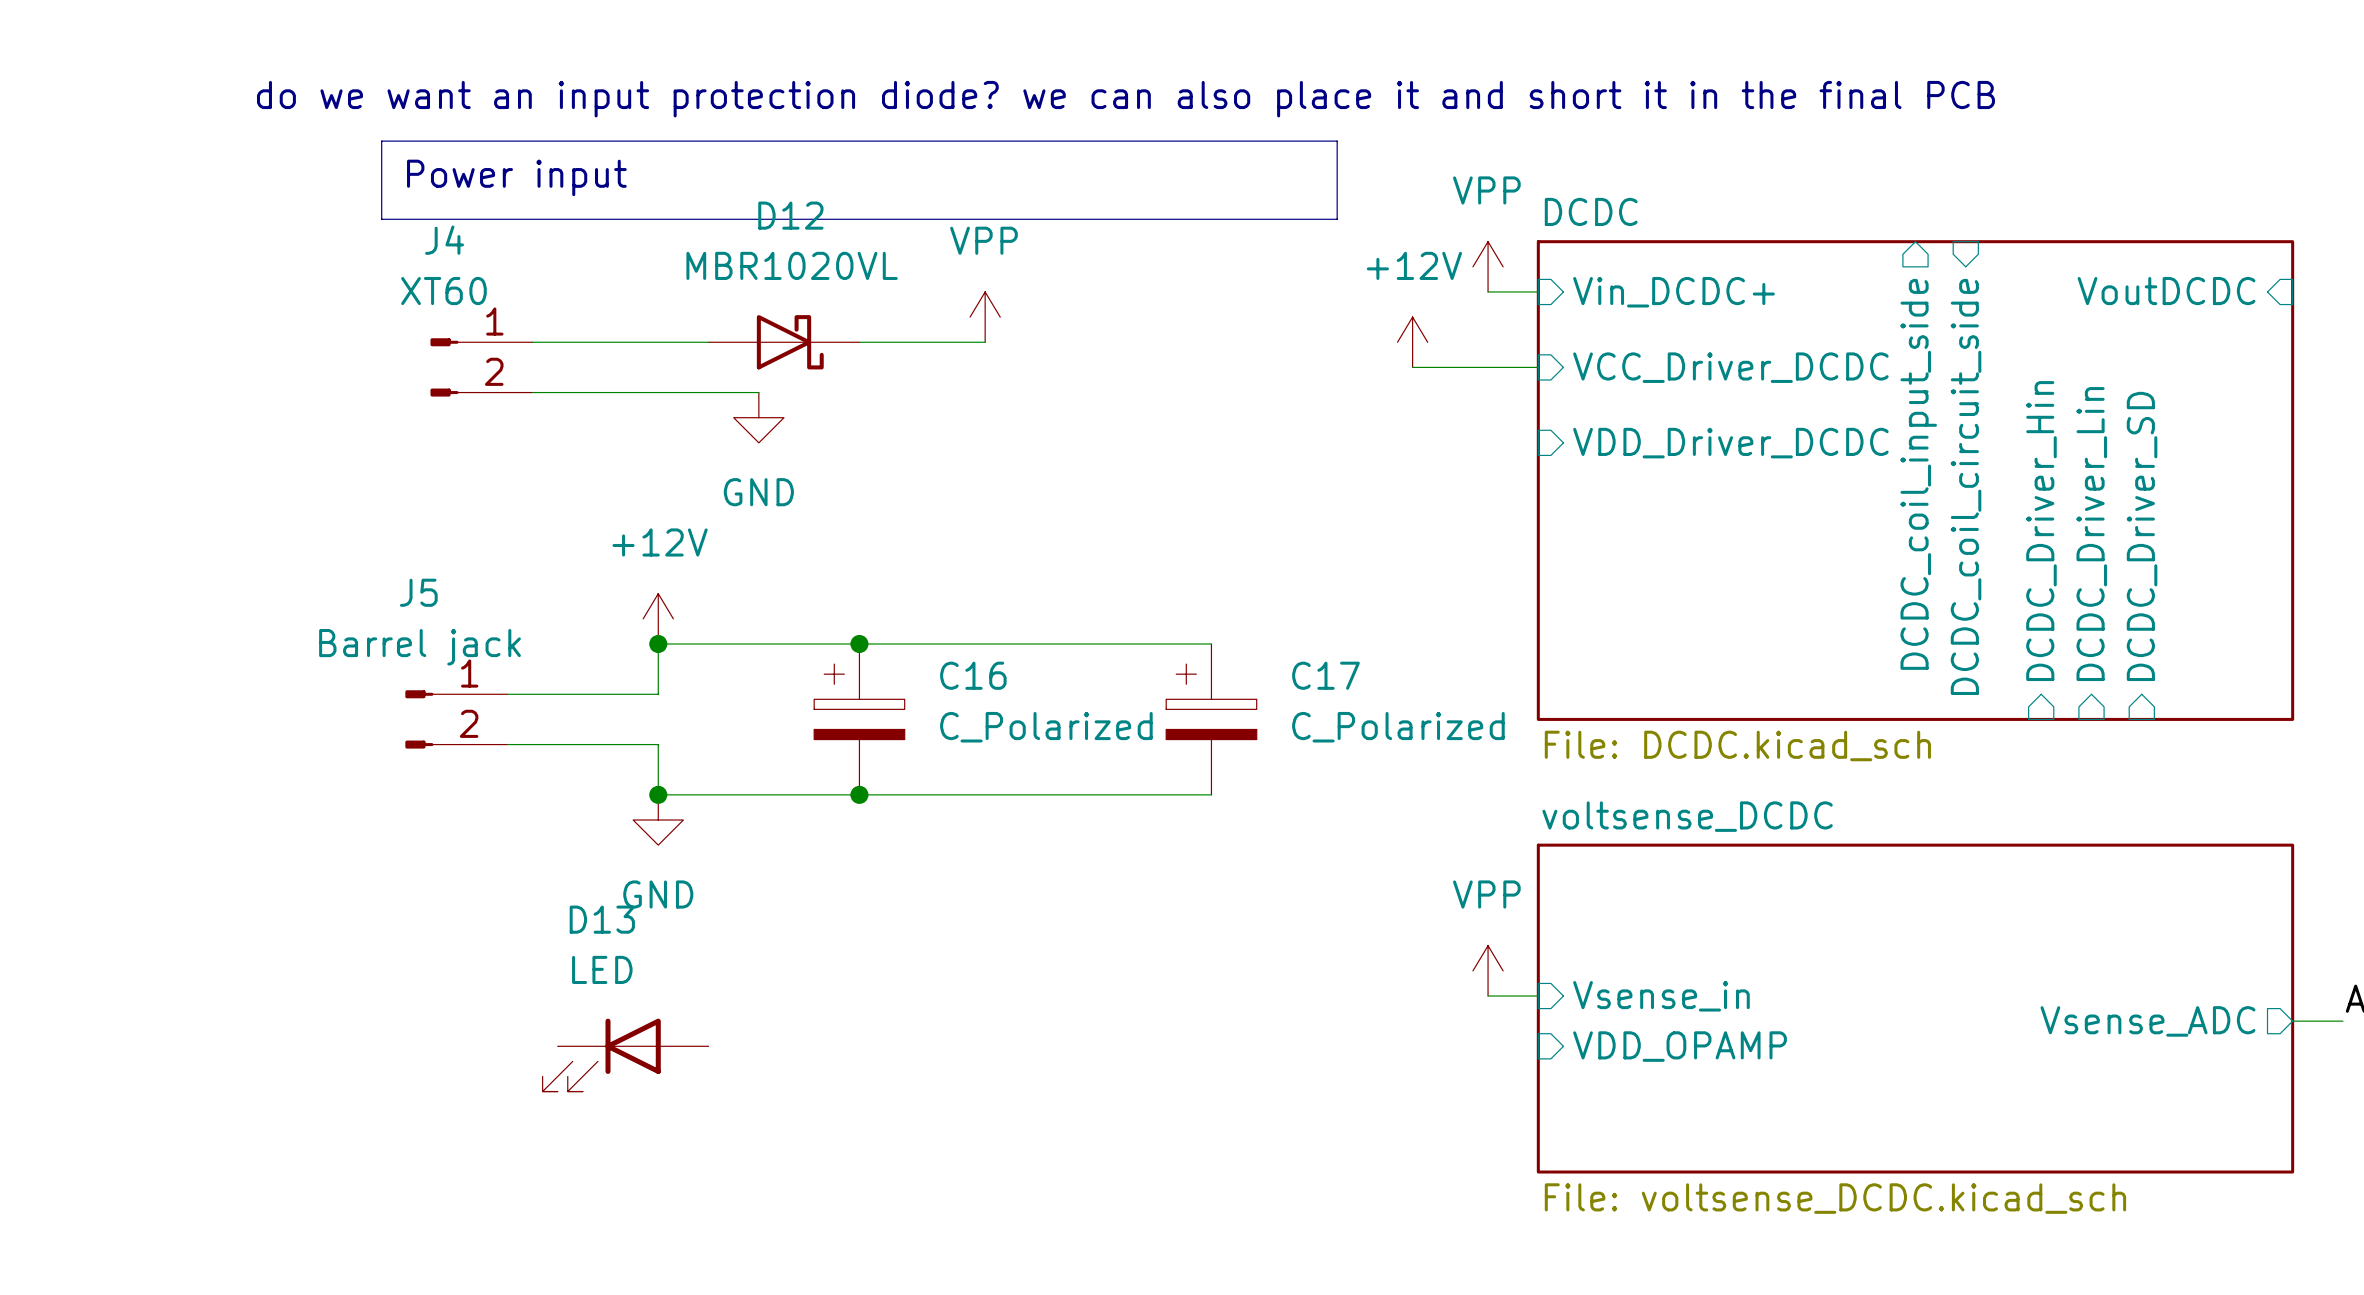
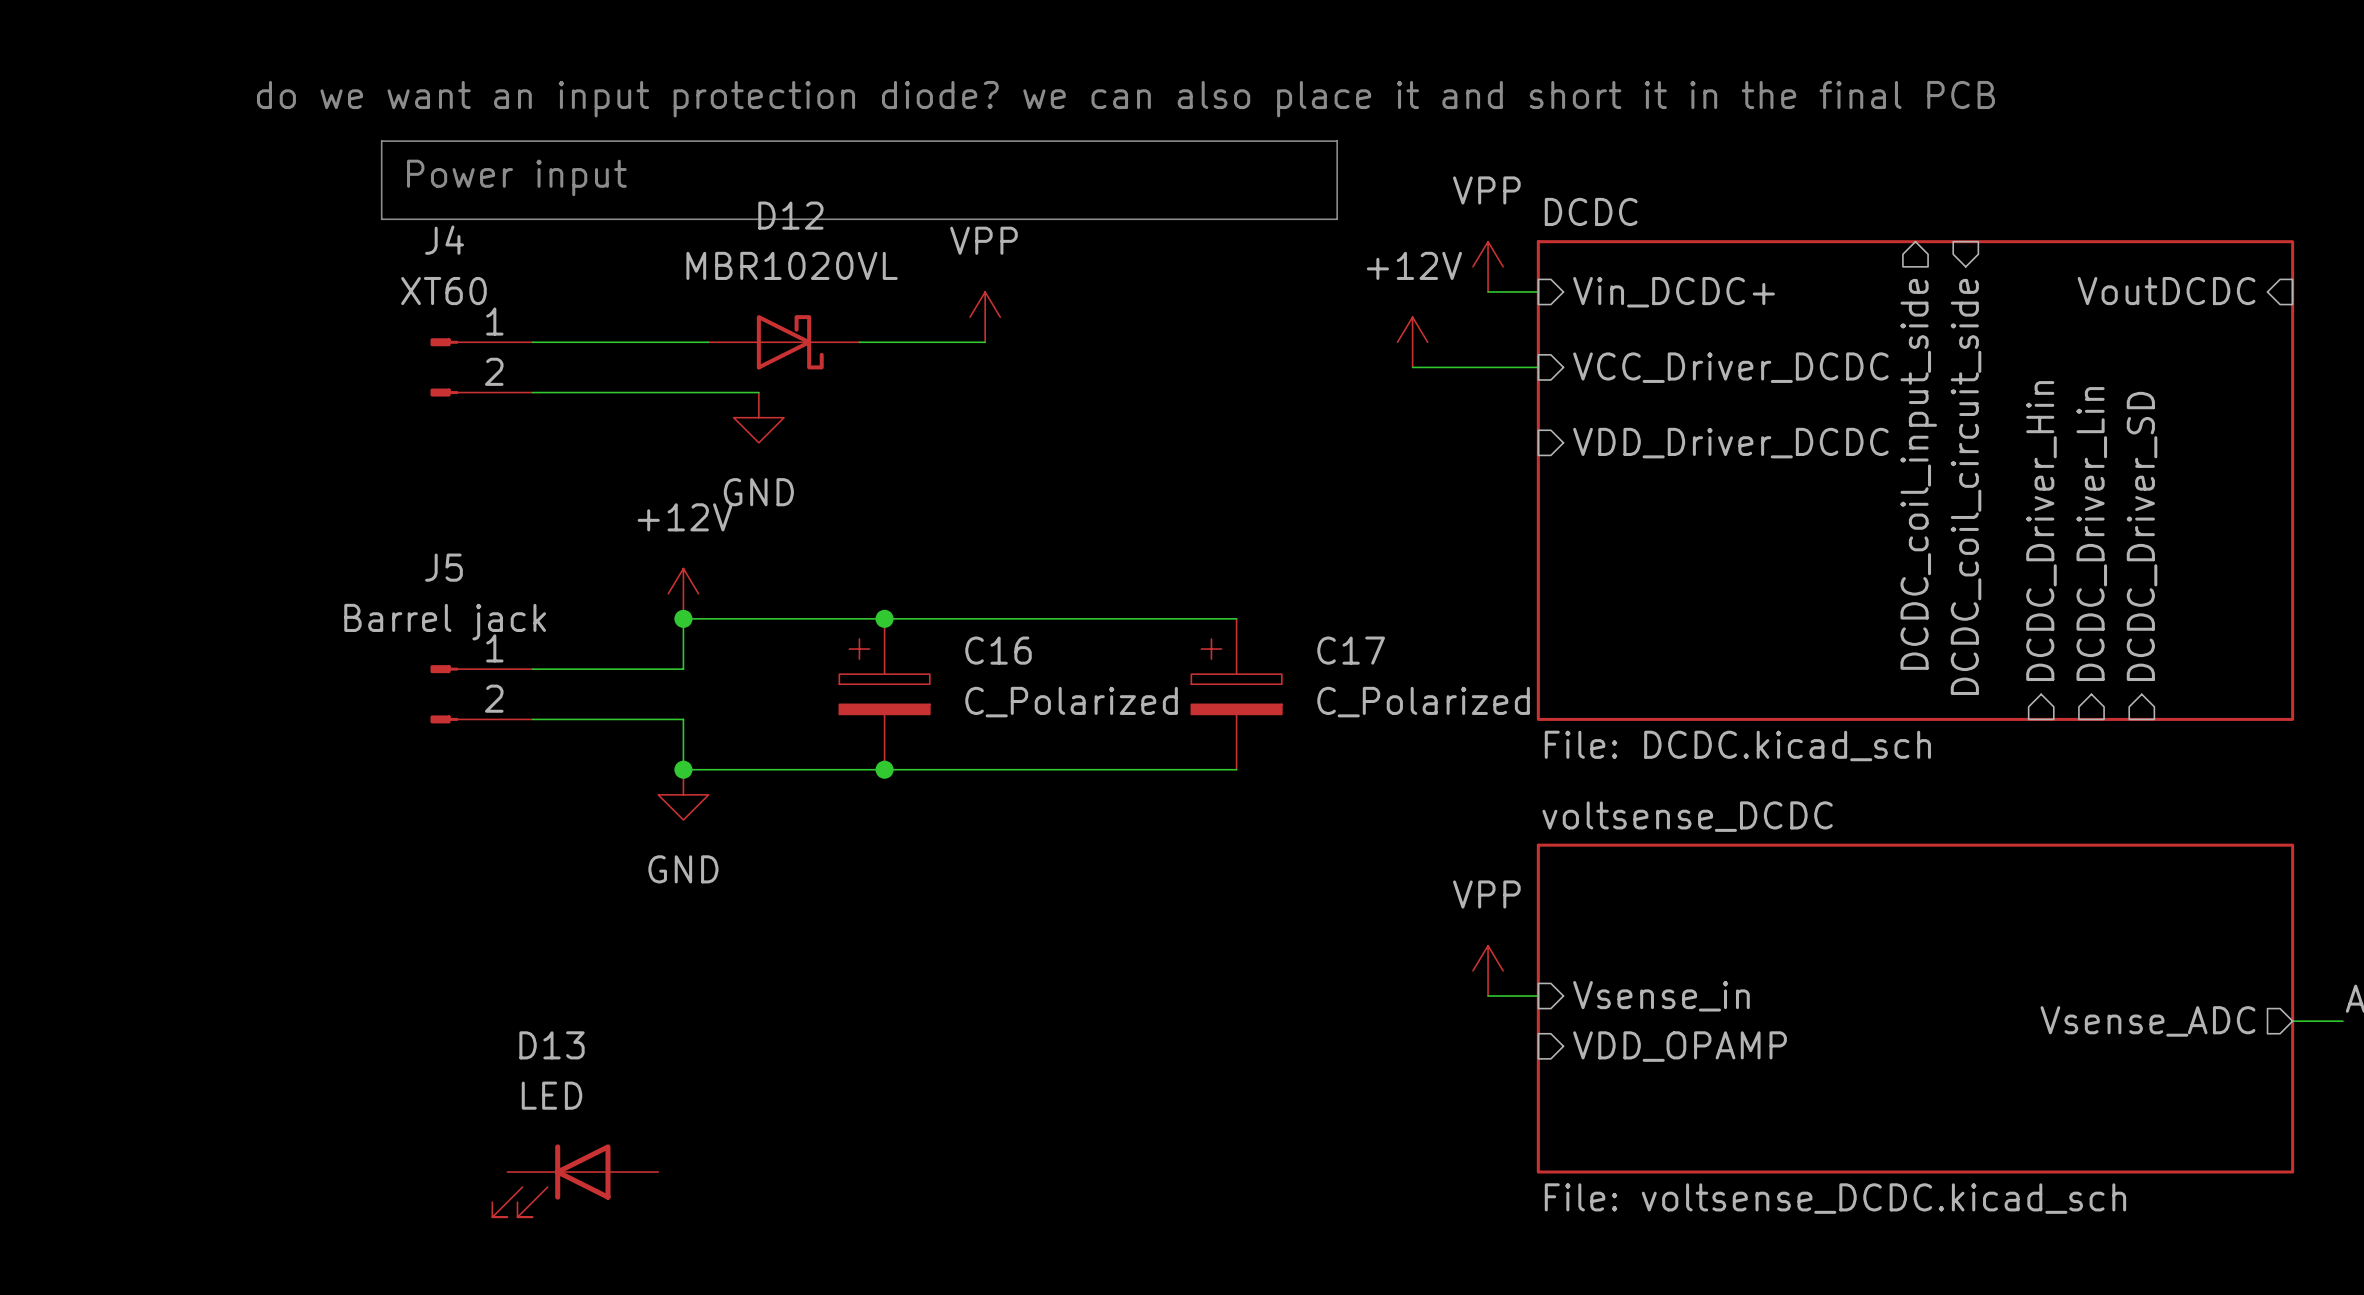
power symbol position: +12V (658, 618) -> +12V (683, 593)
junction position: (658, 643) -> (683, 618)
junction position: (859, 643) -> (884, 618)
wire: (1211, 643) (658, 643) (658, 694) (507, 694) -> (1236, 618) (683, 618) (683, 669) (532, 669)
J5 position: (456, 719) -> (481, 694)
C16 position: (859, 719) -> (884, 694)
C17 position: (1211, 719) -> (1236, 694)
wire: (507, 744) (658, 744) (658, 794) (1211, 794) -> (532, 719) (683, 719) (683, 769) (1236, 769)
junction position: (658, 794) -> (683, 769)
junction position: (859, 794) -> (884, 769)
power symbol position: GND (658, 820) -> GND (683, 794)
D13 position: (625, 1055) -> (575, 1180)

